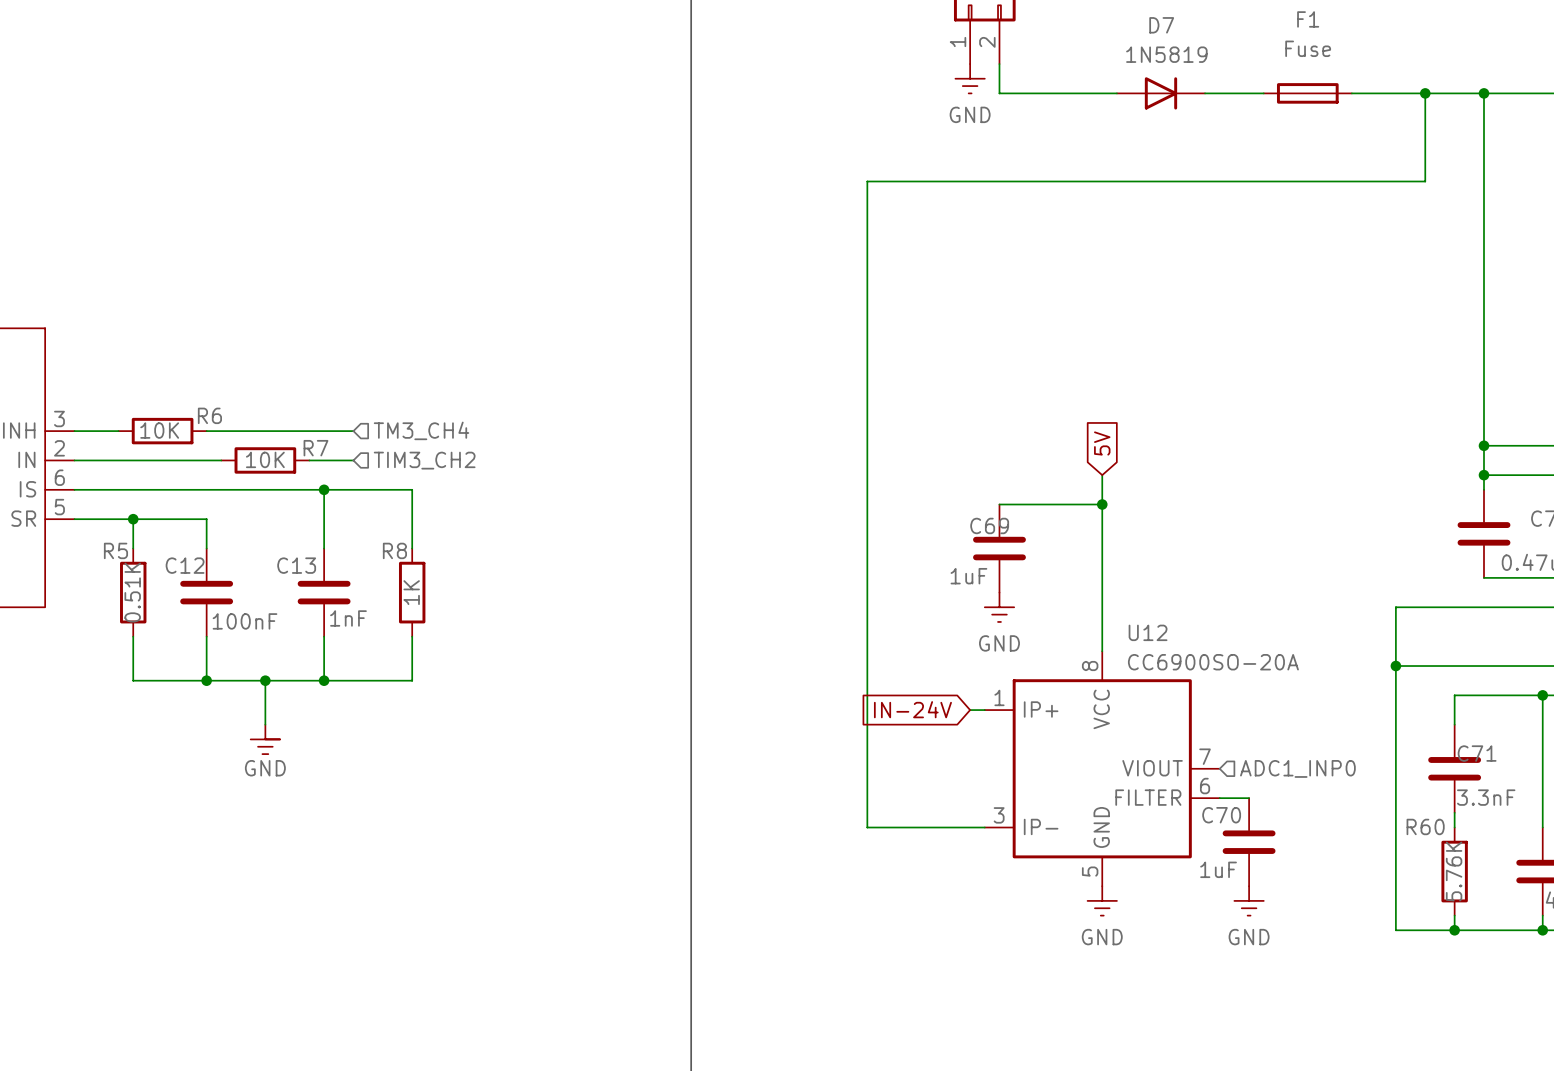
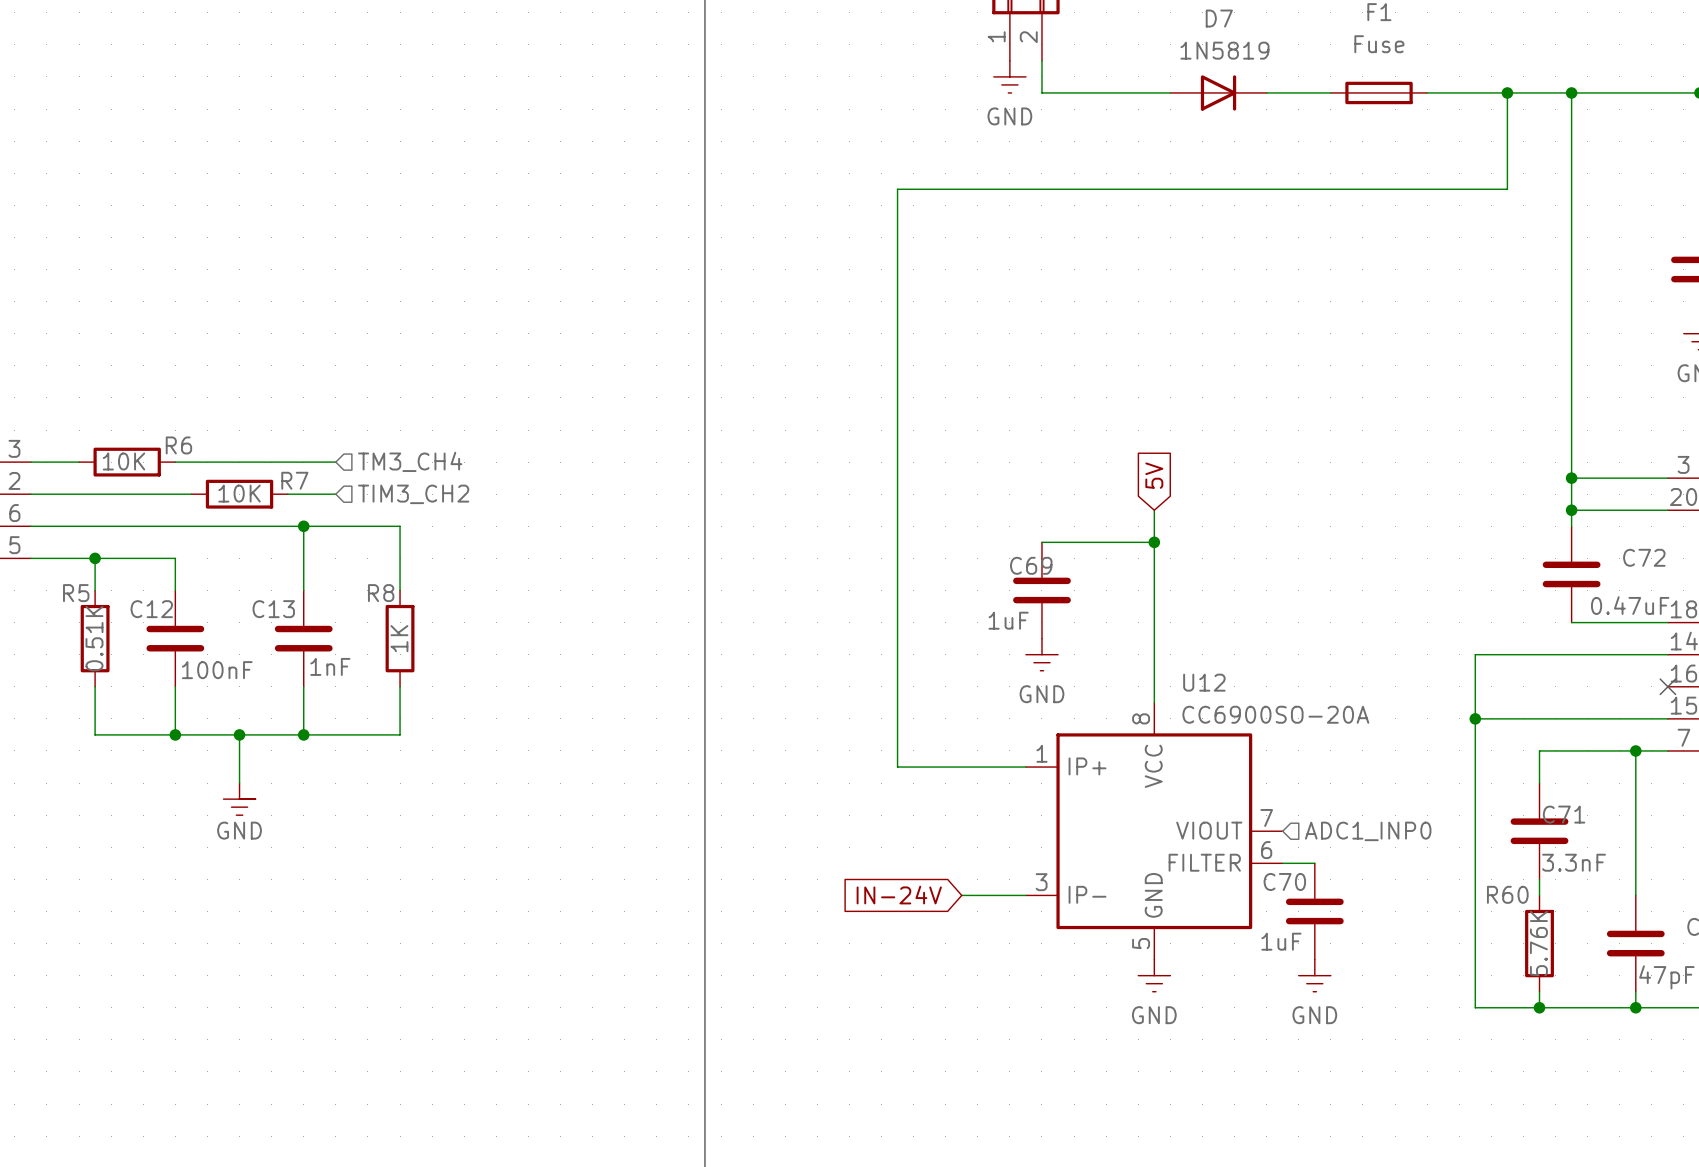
global label position: IN-24V (912, 709) -> IN-24V (899, 895)
wire: (867, 710) (867, 827) (926, 827) -> (897, 767) (1009, 767)

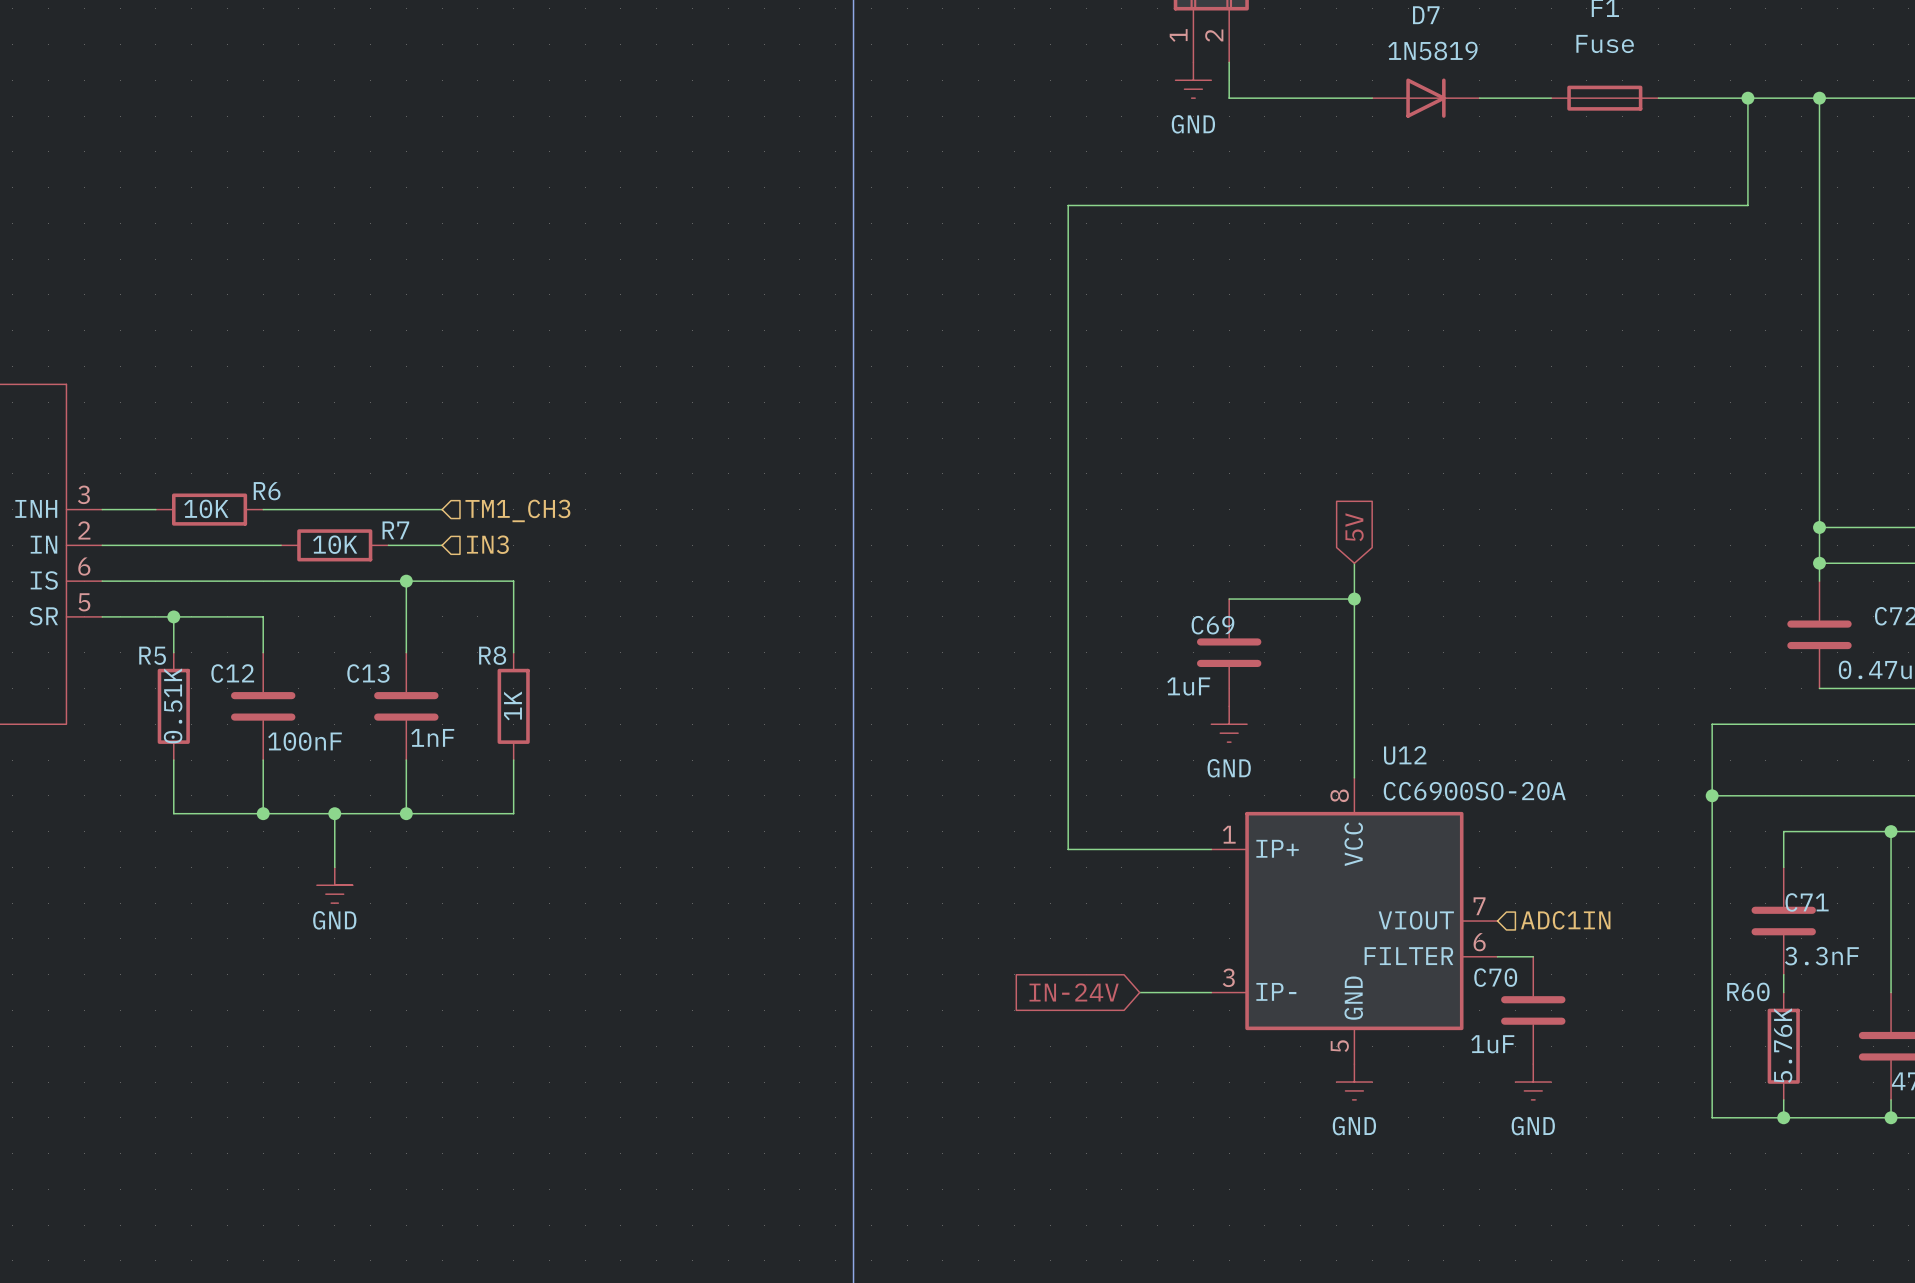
hierarchical label: TM3_CH4 (410, 461) -> TM1_CH3 (517, 510)
hierarchical label: TIM3_CH2 (413, 494) -> IN3 (487, 544)
hierarchical label: ADC1_INP0 (1368, 831) -> ADC1IN (1565, 920)

